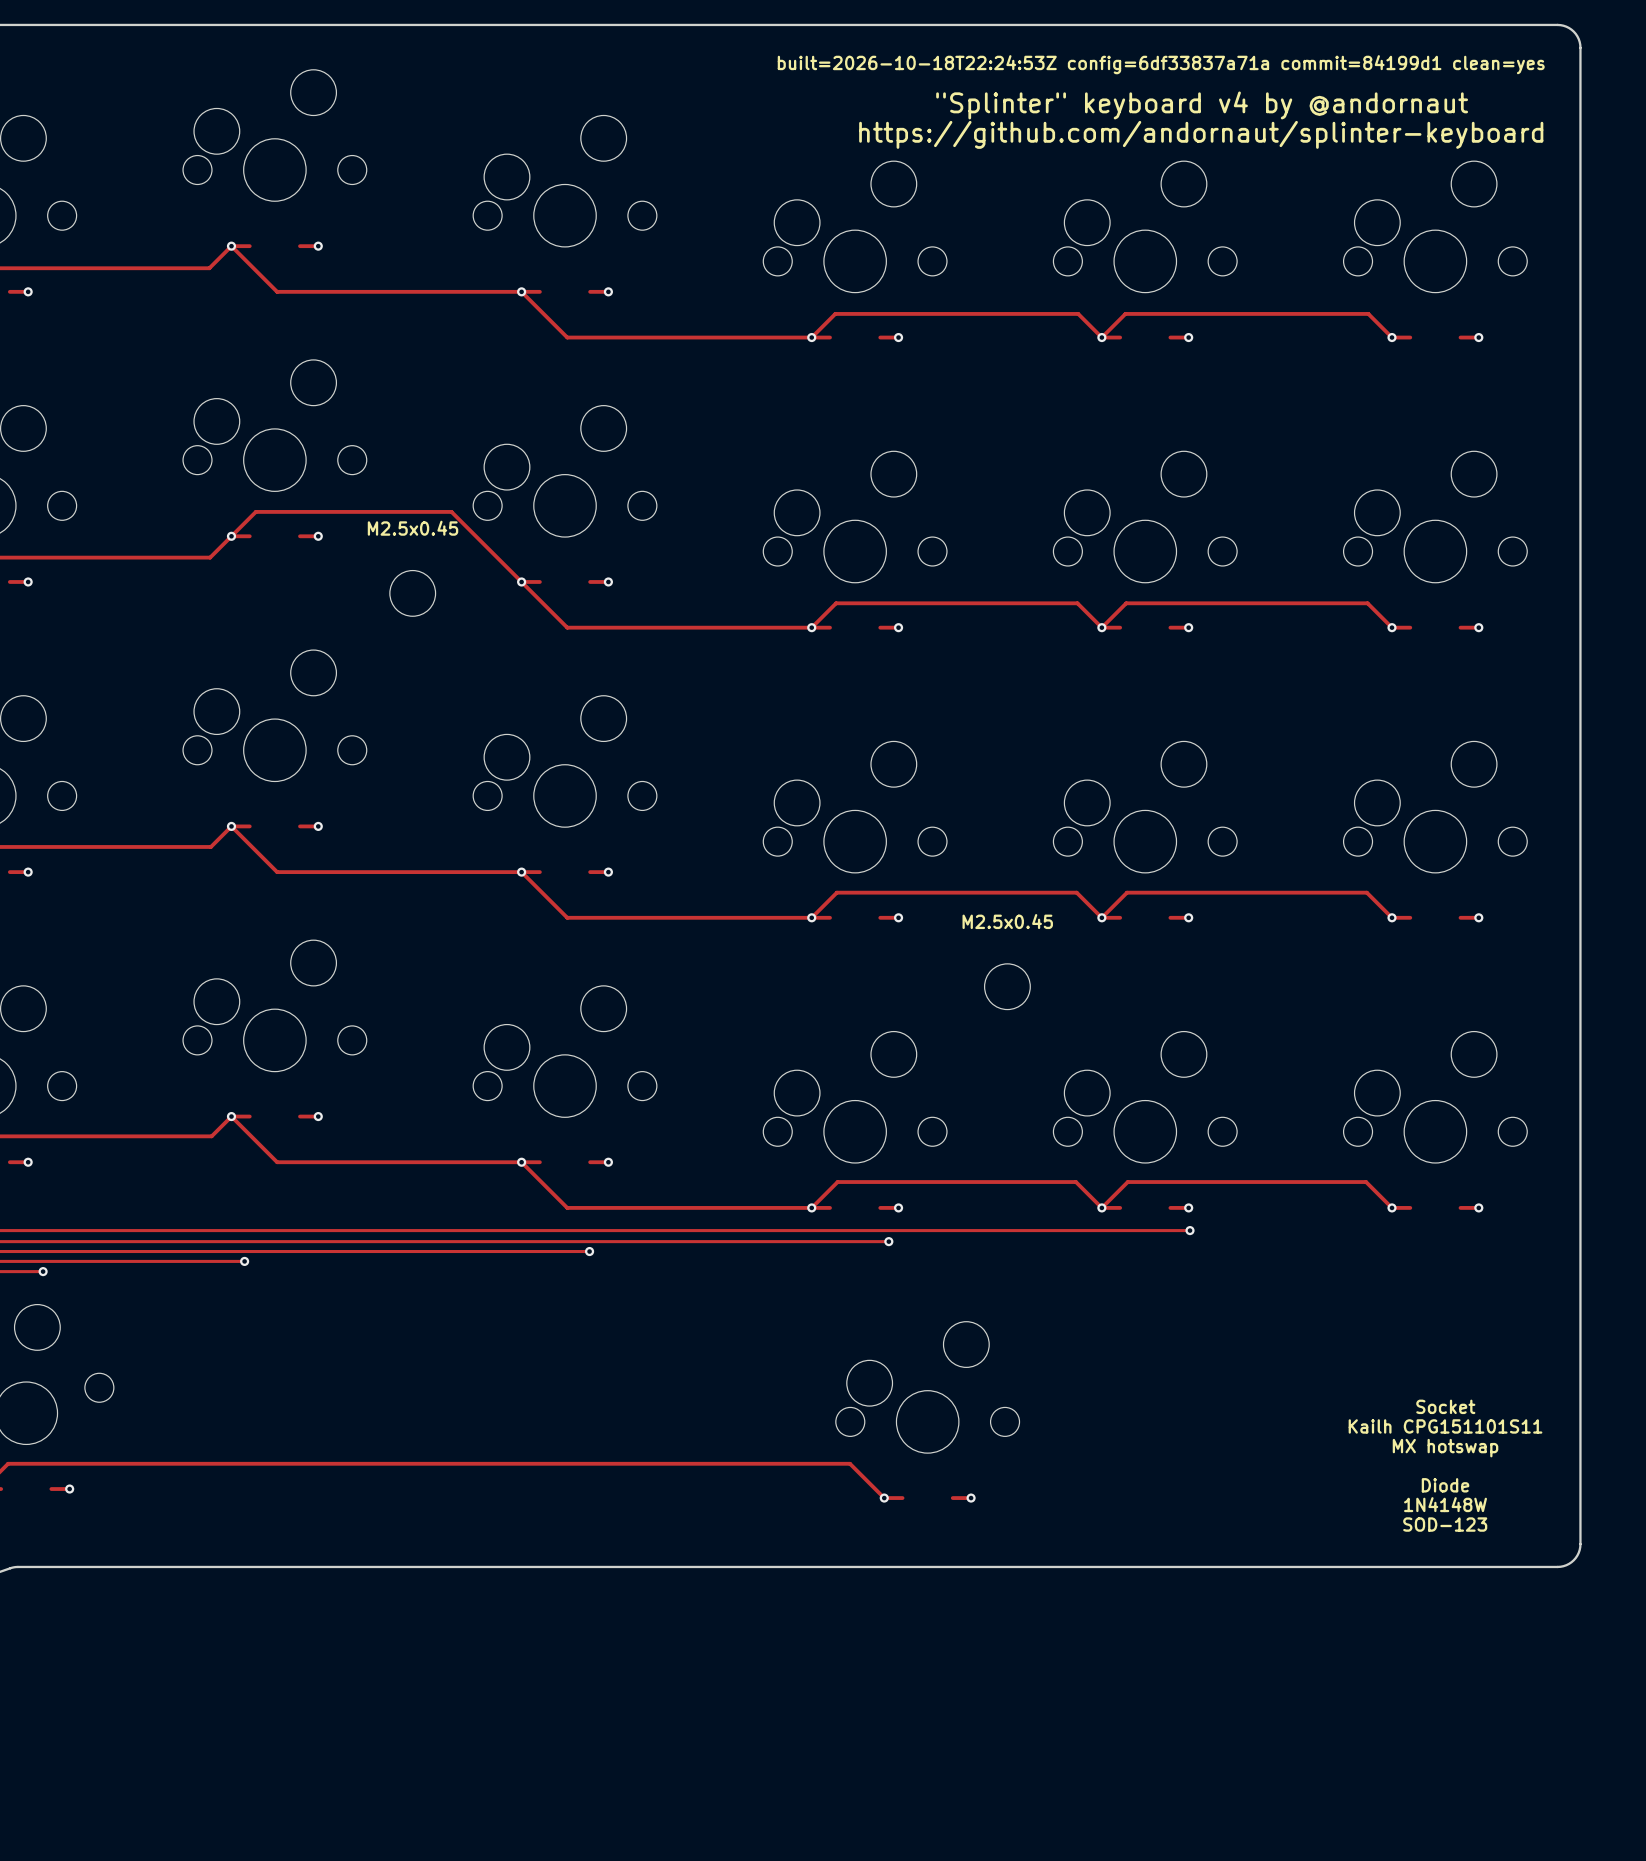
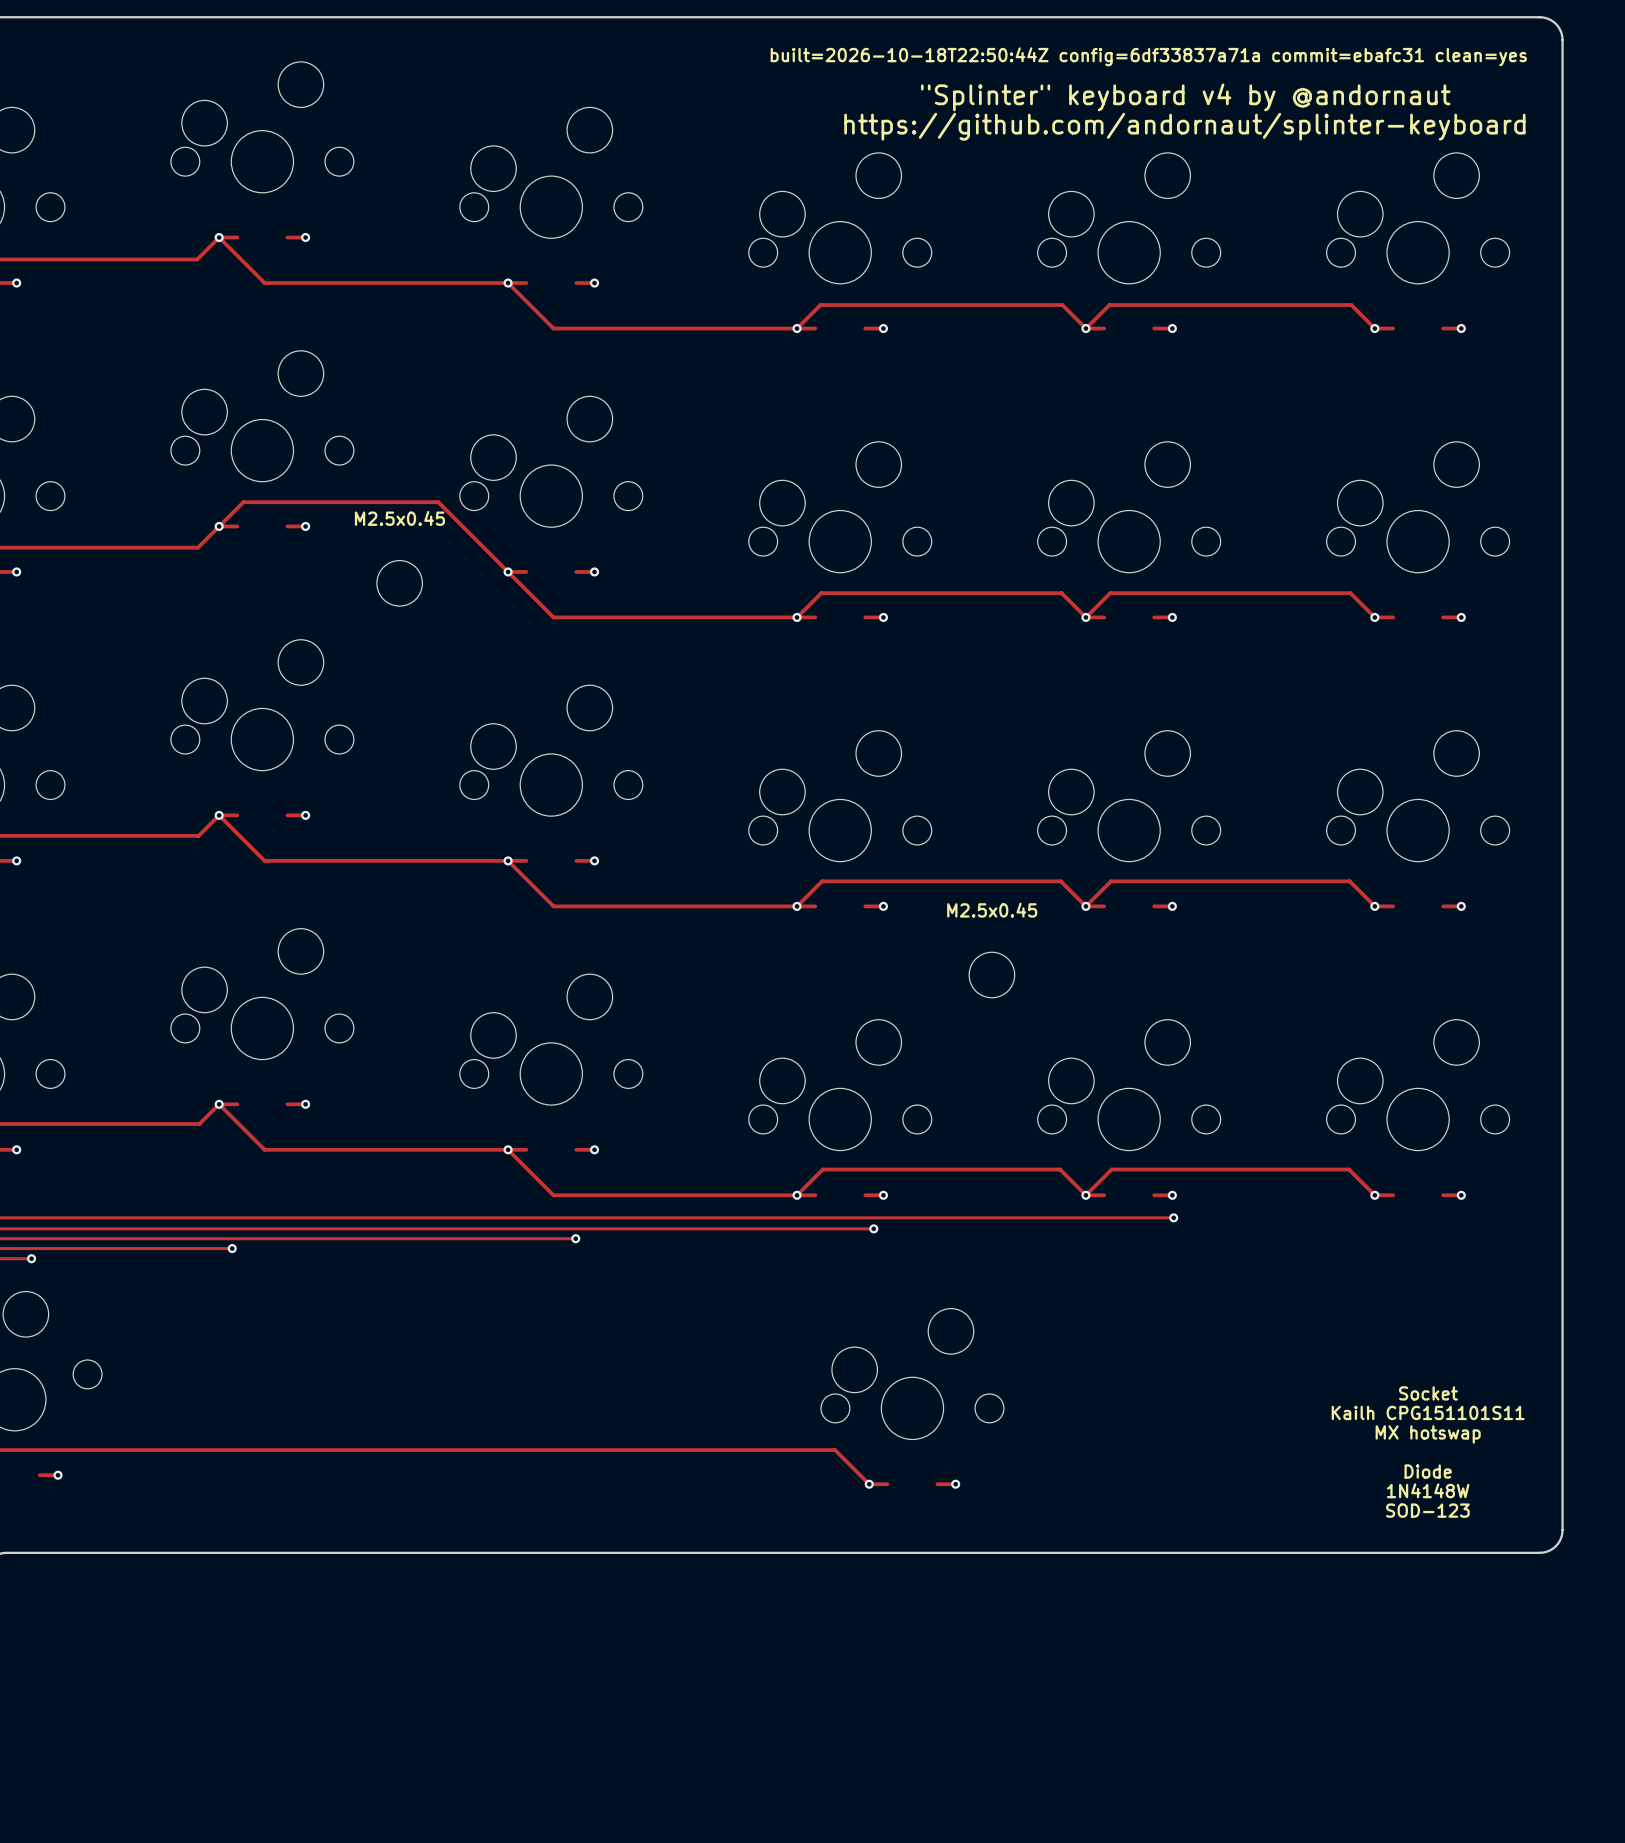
text: built=2026-10-18T22:24:53Z config=6df33837a71a commit=84199d1 clean=yes (1161, 64) -> built=2026-10-18T22:50:44Z config=6df33837a71a commit=ebafc31 clean=yes (1148, 56)

